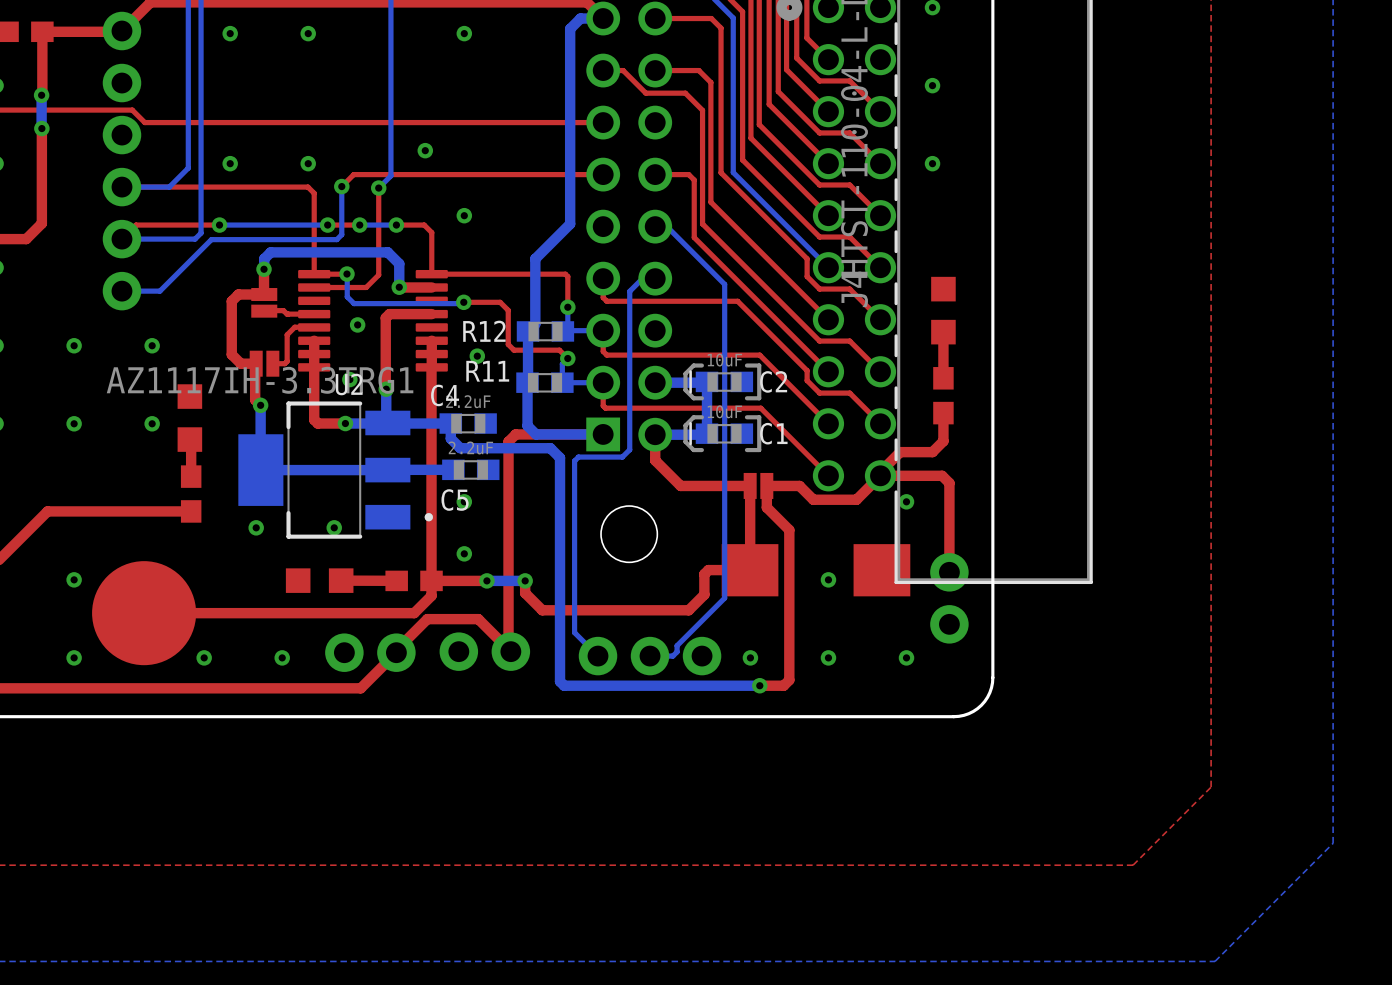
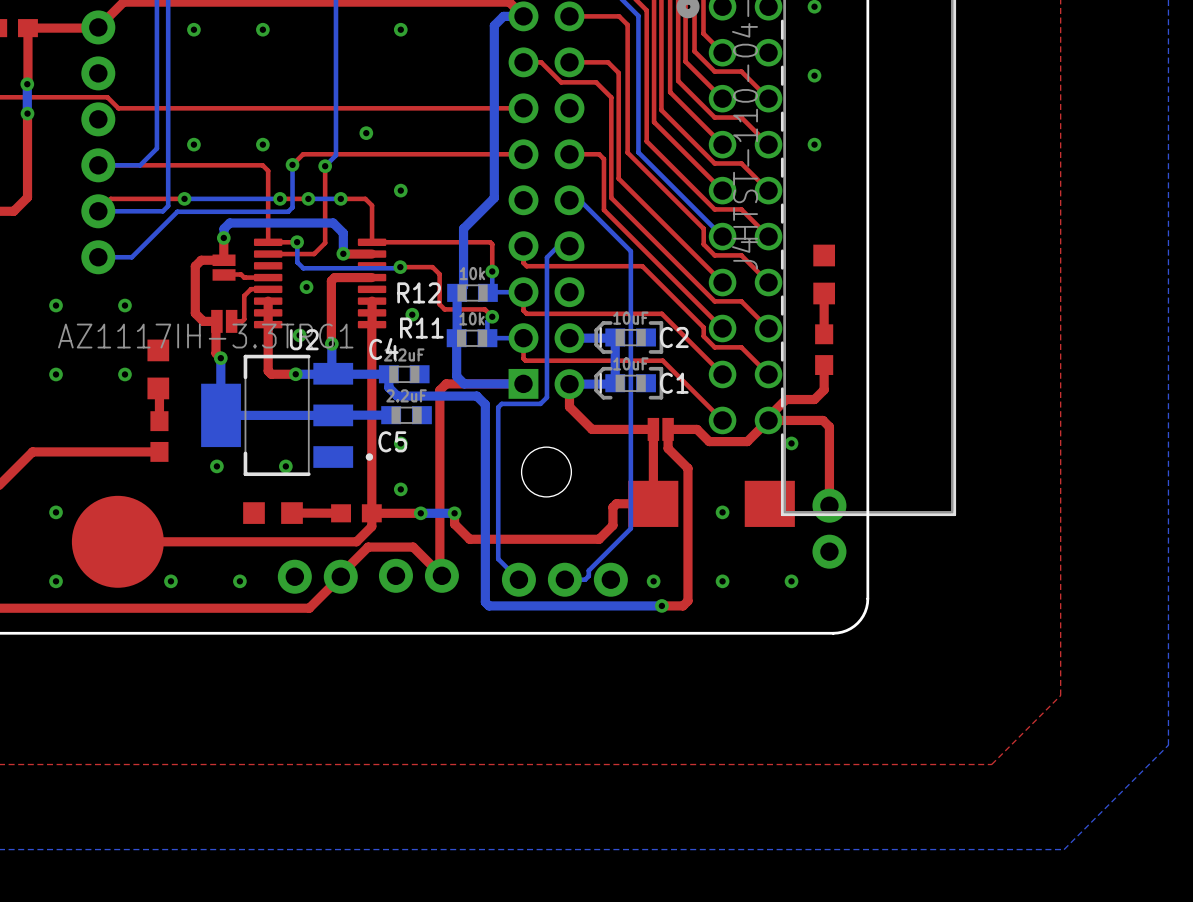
R12 value: none -> 10k (472, 273)
R11 value: none -> 10k (472, 318)

